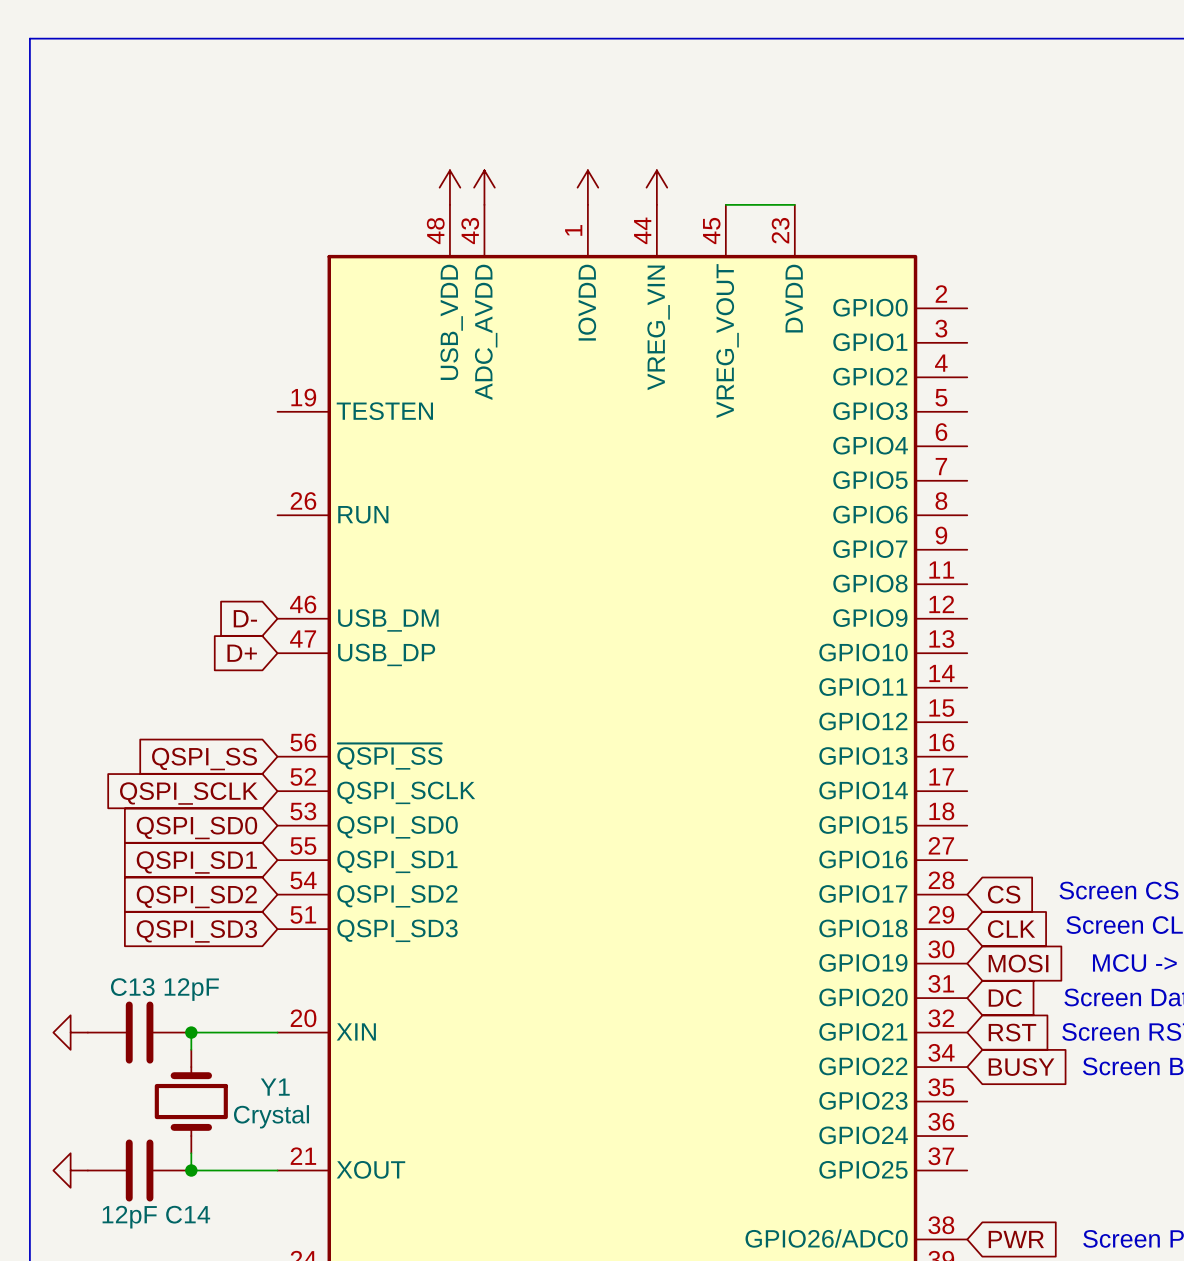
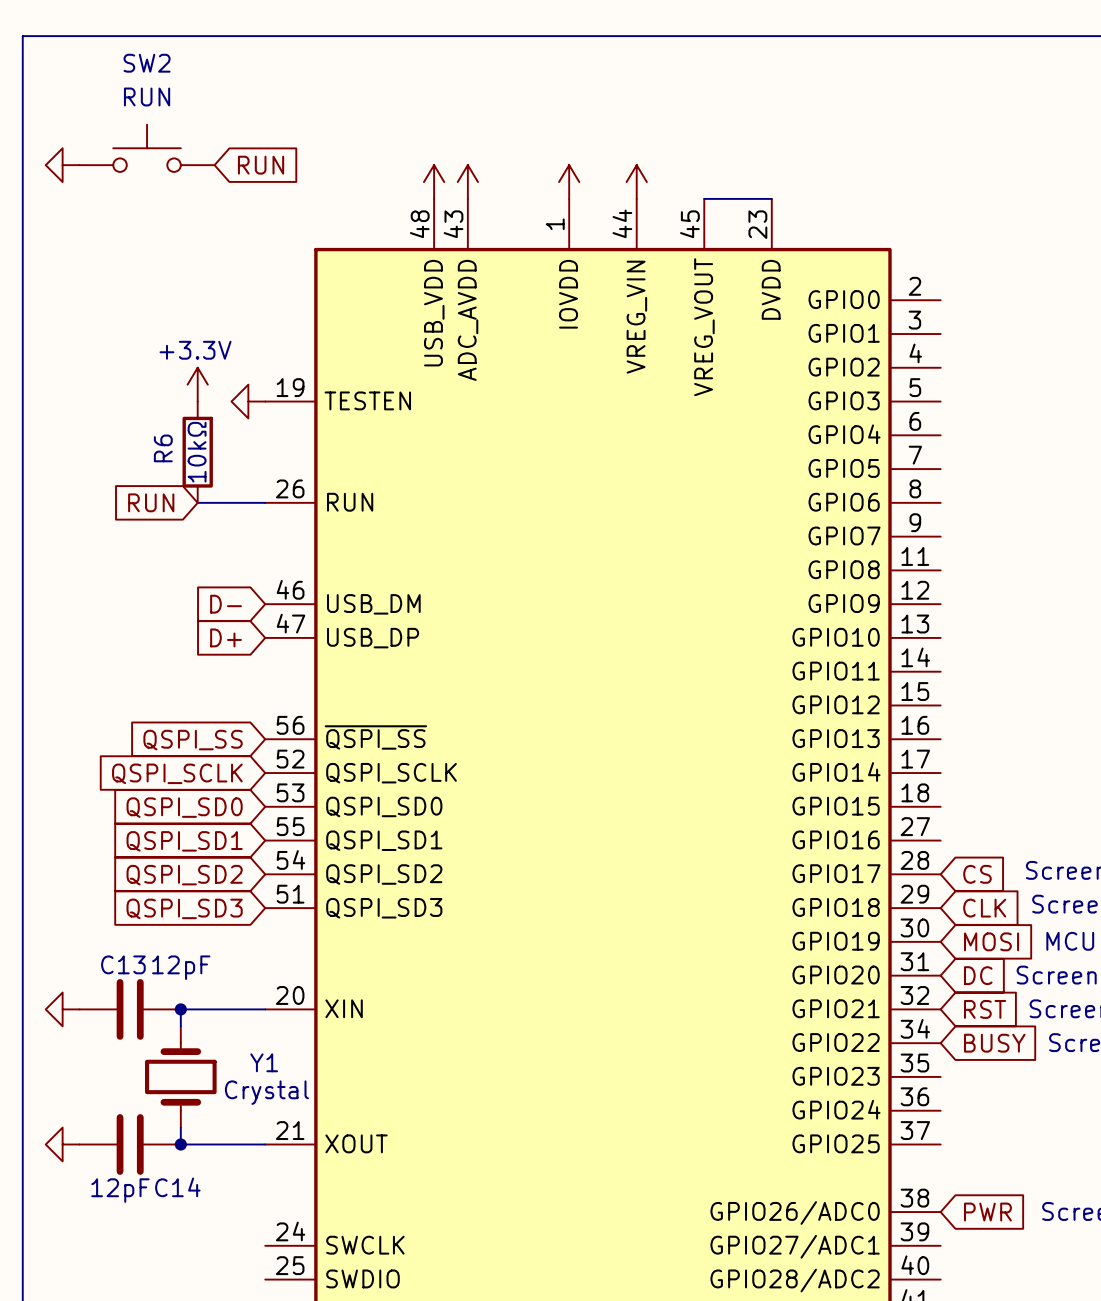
SW2: none -> RUN (147, 148)
power symbol: none -> (62, 165)
global label: none -> RUN (261, 165)
power symbol: none -> +3.3V (197, 384)
power symbol: none -> (248, 401)
R6: none -> 10kΩ (197, 452)
global label: none -> RUN (151, 502)
wire: none -> (197, 502) (265, 502)

